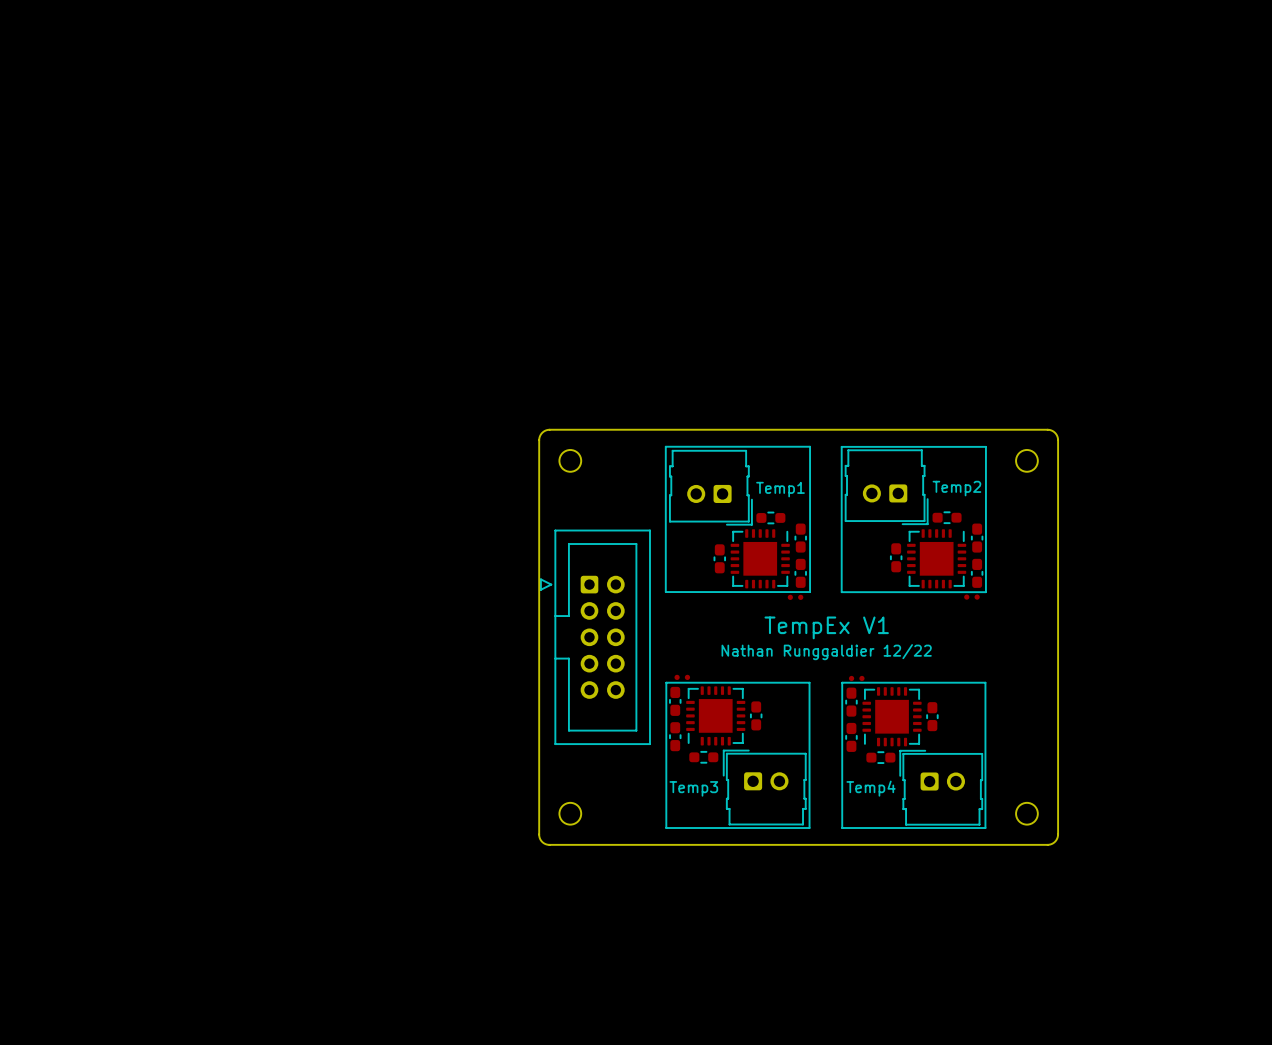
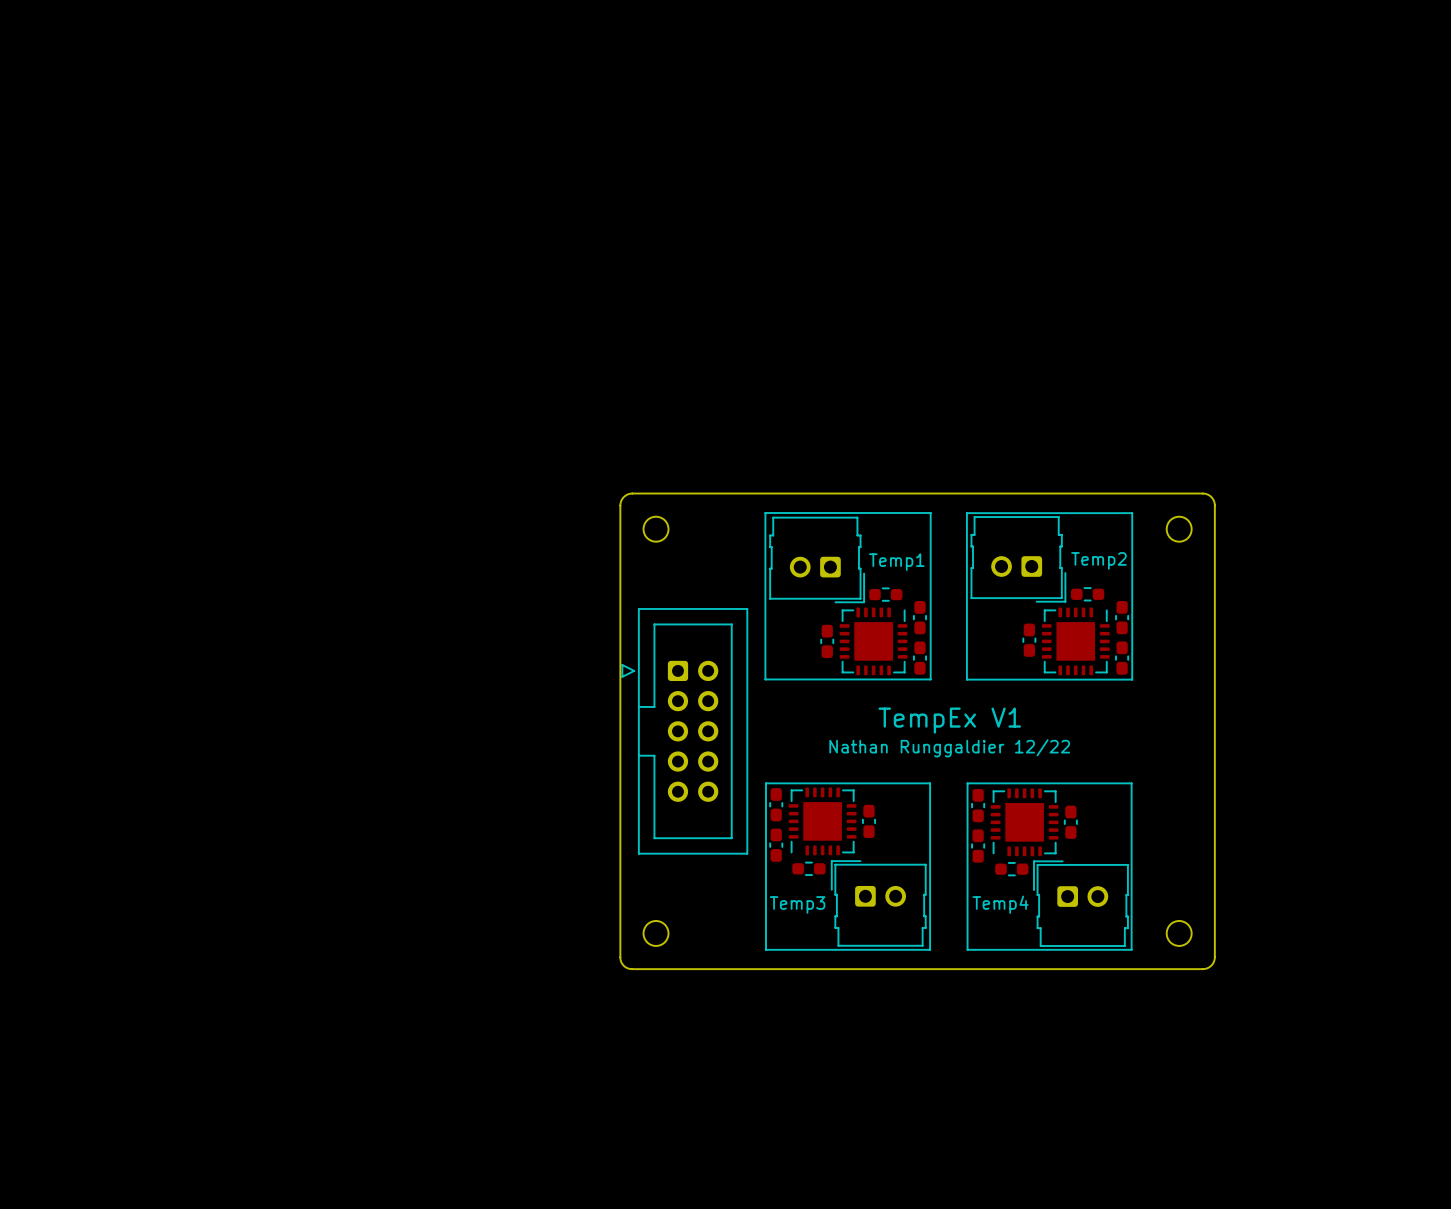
part: (795, 597) -> none
part: (971, 597) -> none
part: (682, 677) -> none
part: (856, 678) -> none

